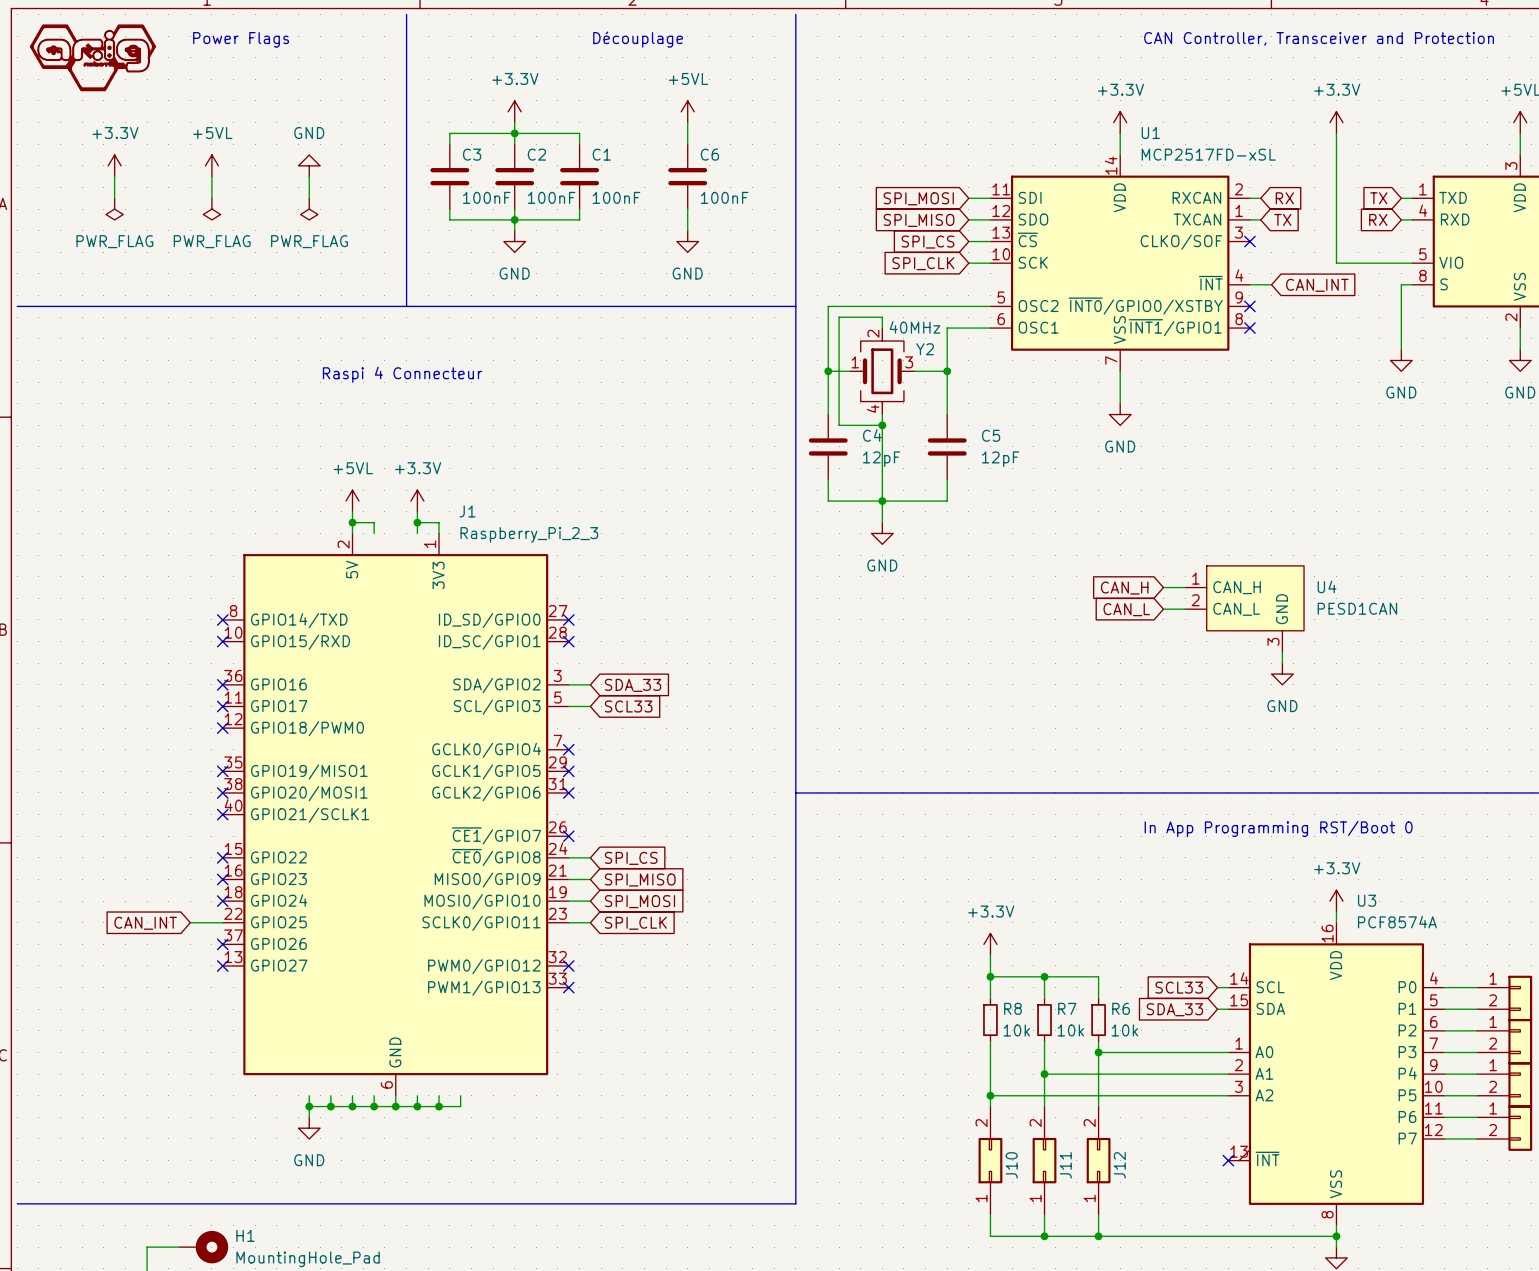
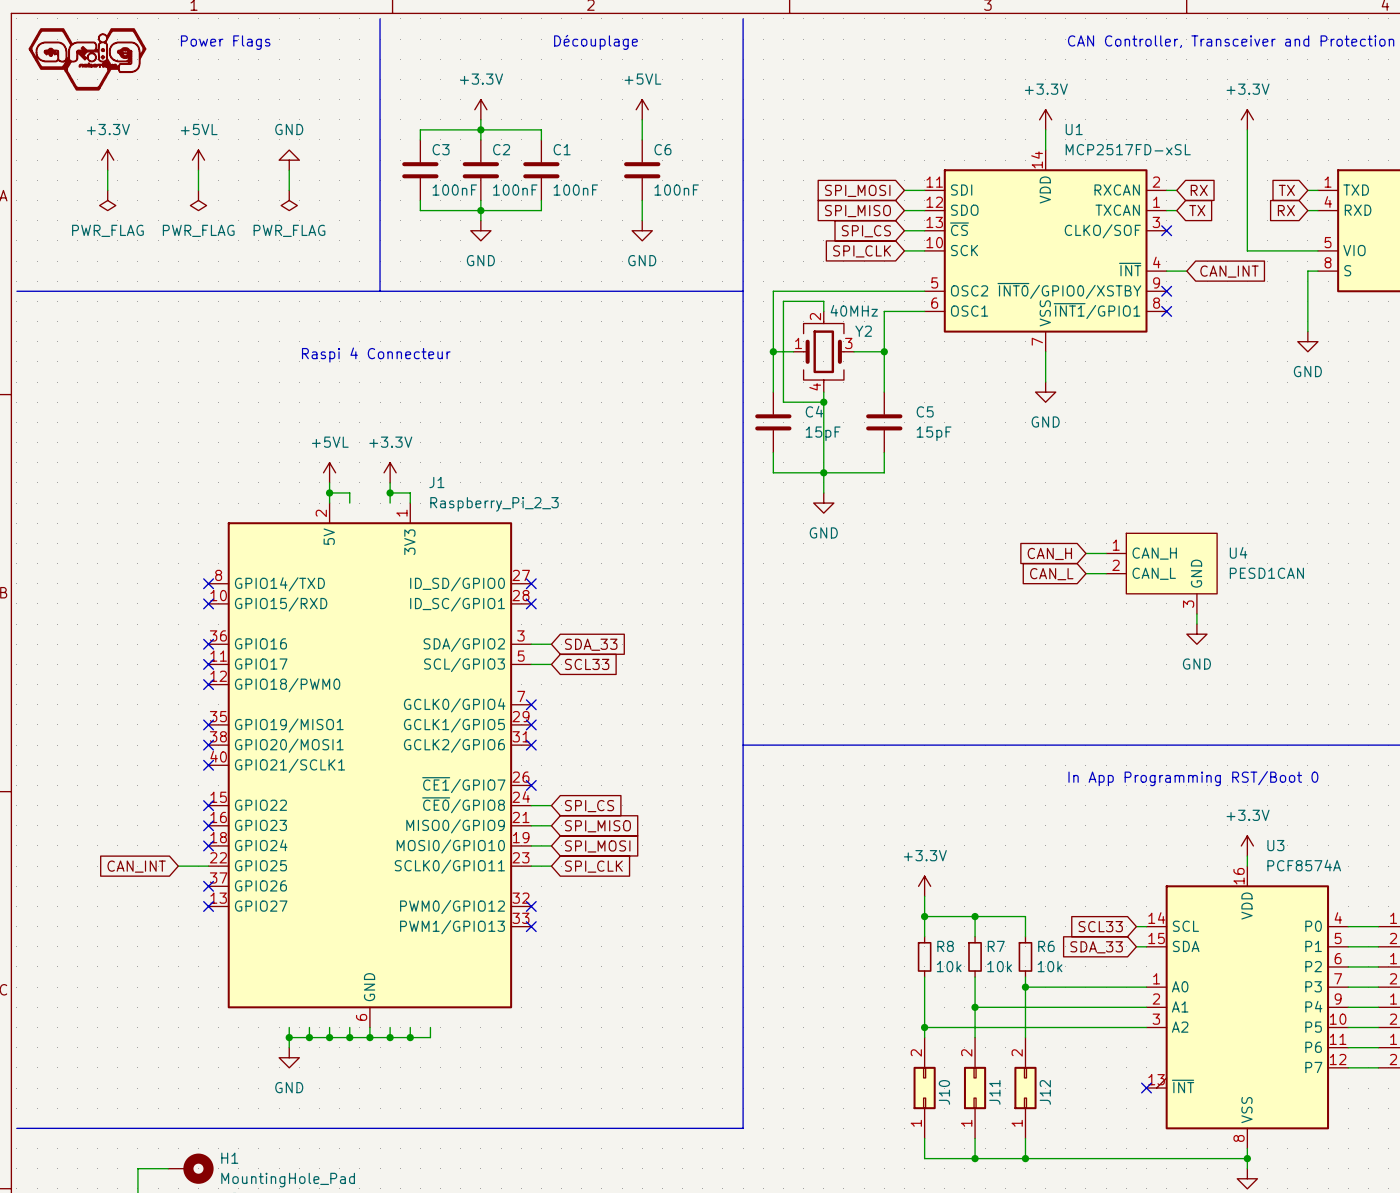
C4 value: 12pF (881, 459) -> 15pF (823, 433)
C5 value: 12pF (1000, 459) -> 15pF (934, 433)

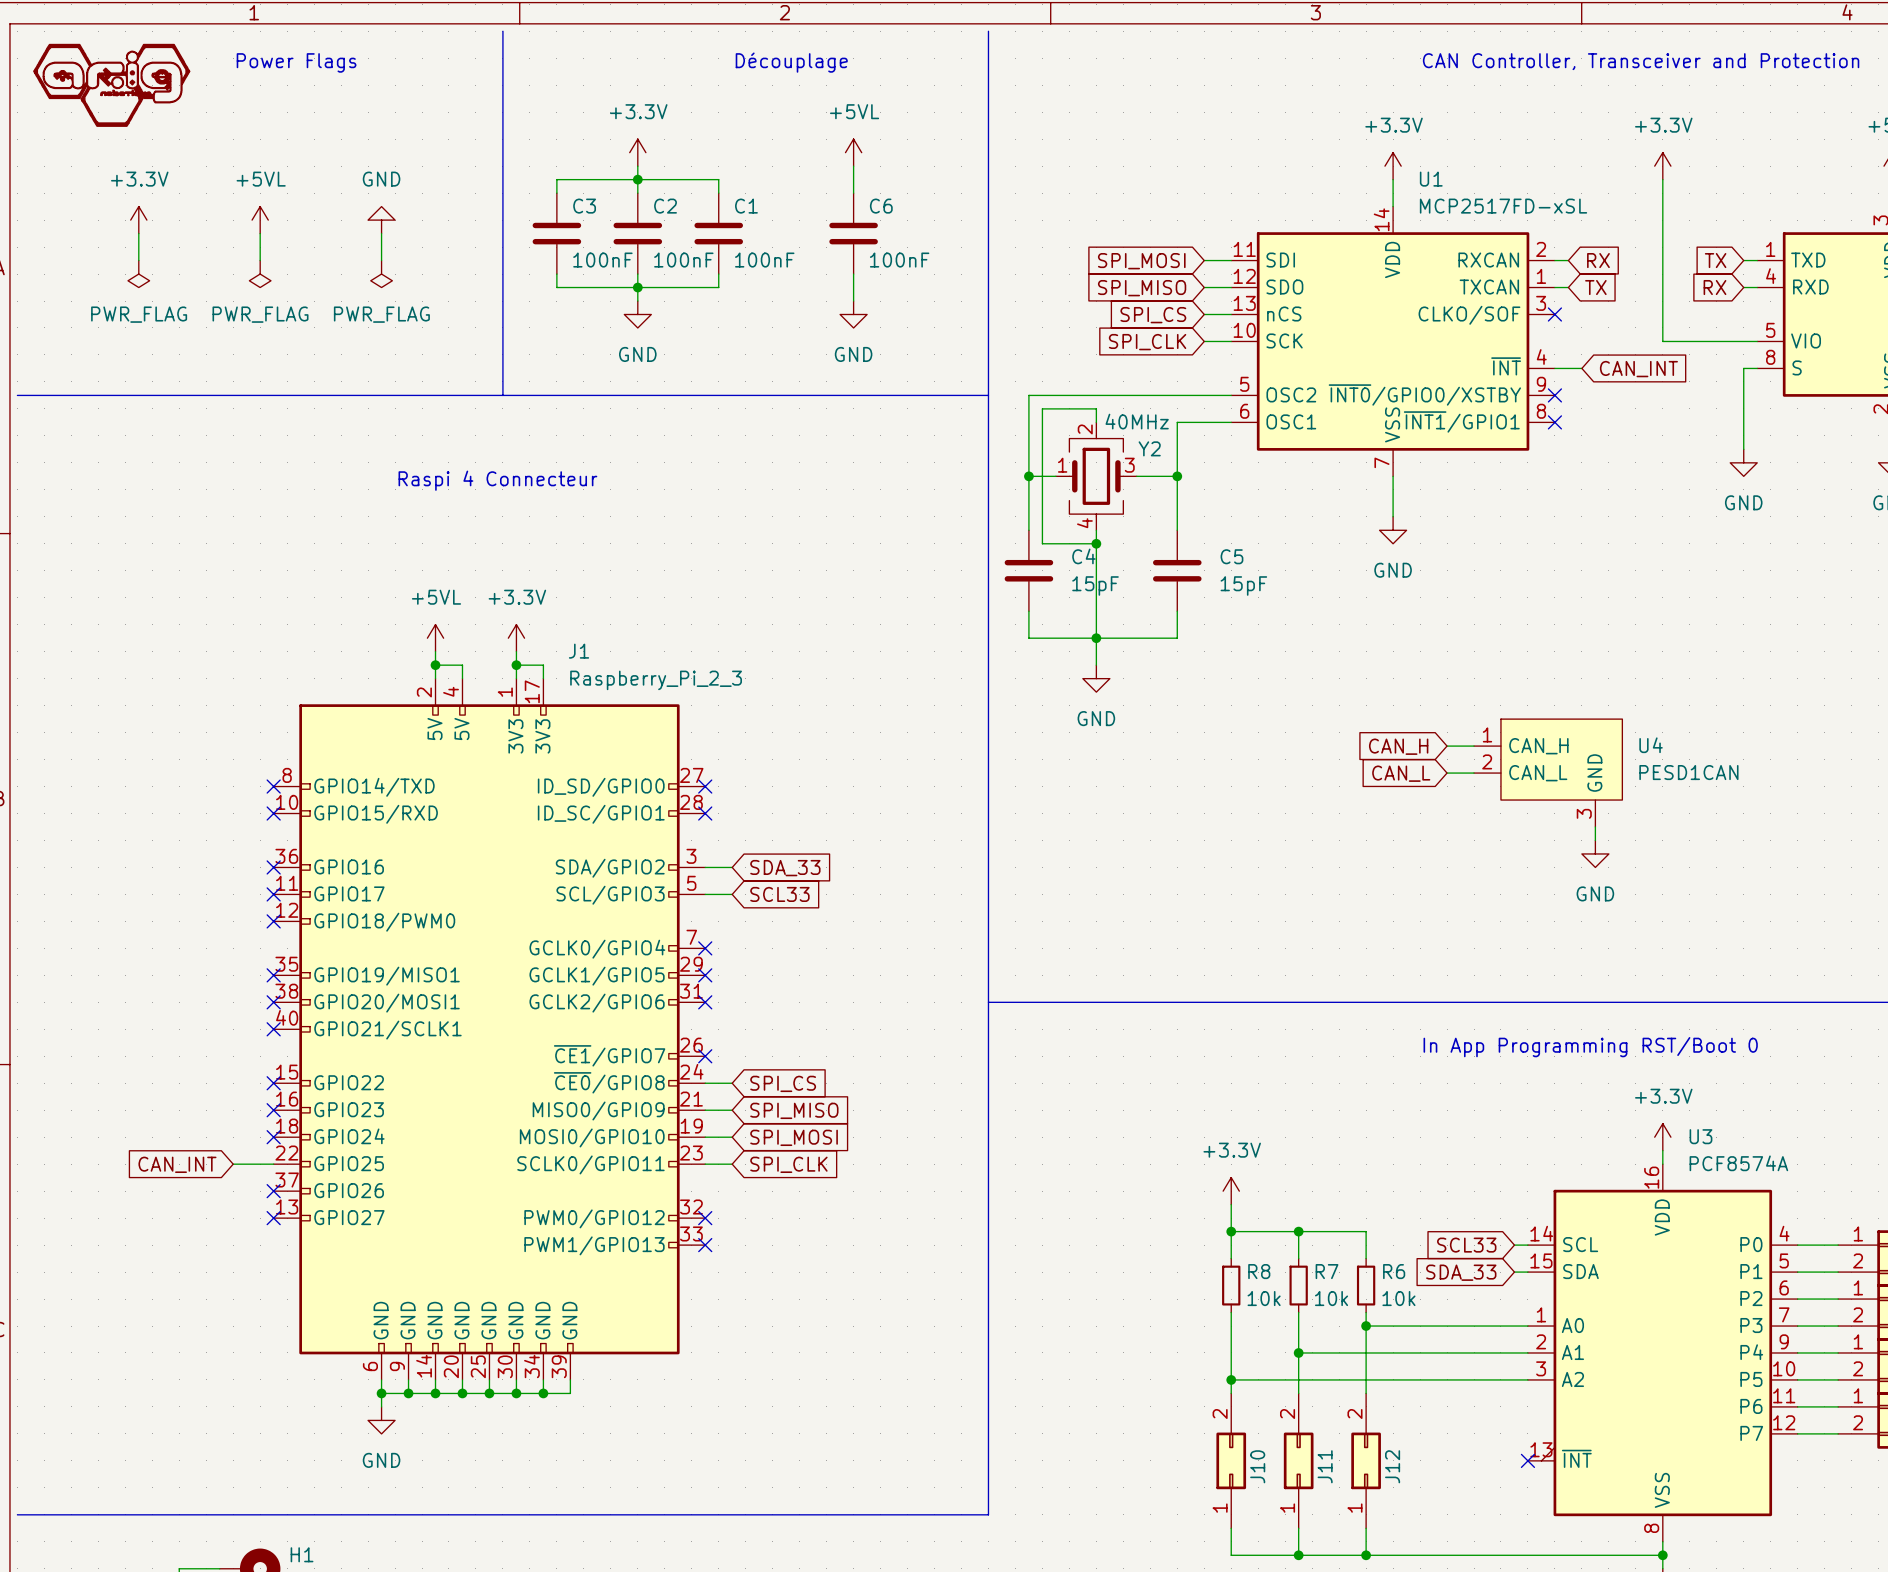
U1 pin name: ~{CS} (959, 229) -> nCS (1284, 313)
J1 symbol: [208, 503, 532, 1028] -> [273, 678, 706, 1380]

